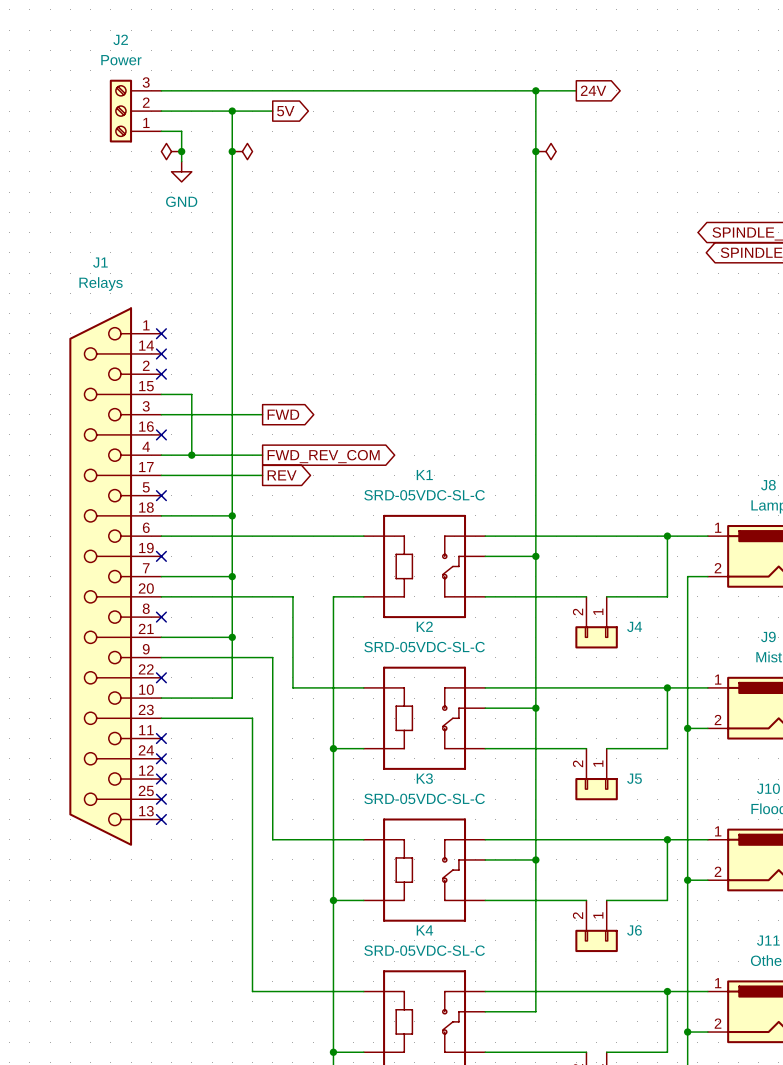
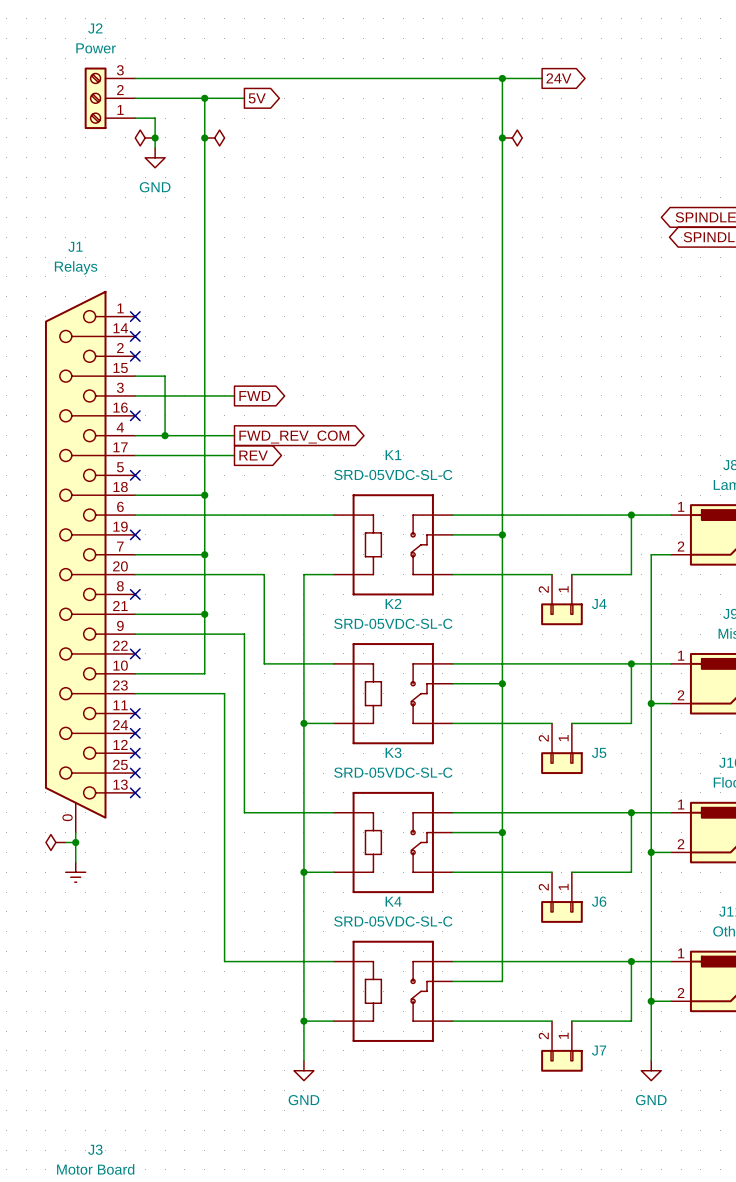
J1 symbol: [69, 307, 162, 846] -> [44, 290, 136, 833]
wire: none -> (75, 832) (75, 862)
power symbol: none -> (55, 842)
wire: none -> (65, 842) (75, 842)
junction: none -> (75, 842)
power symbol: none -> (75, 872)

